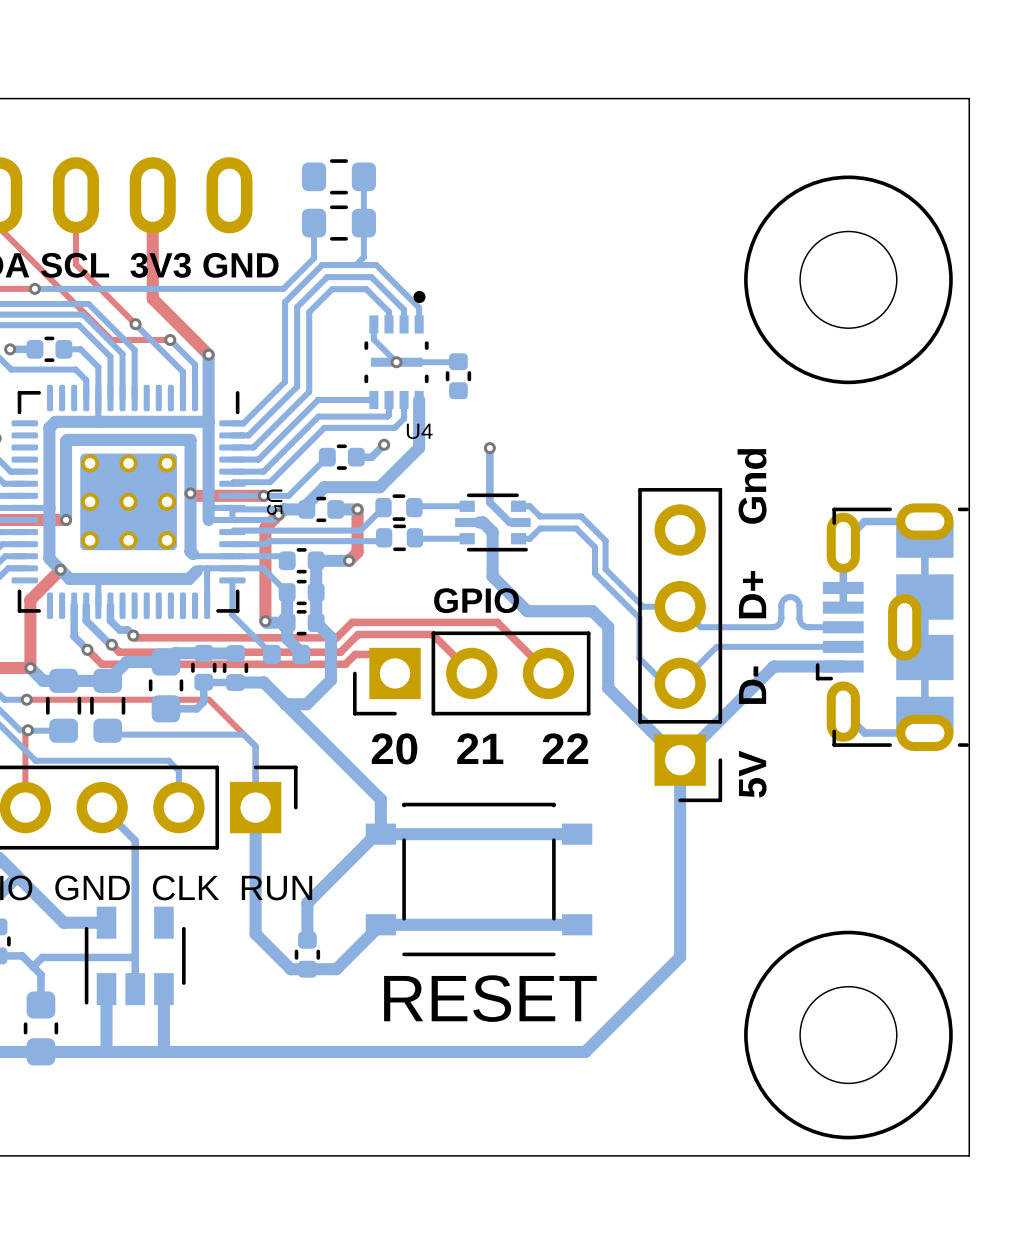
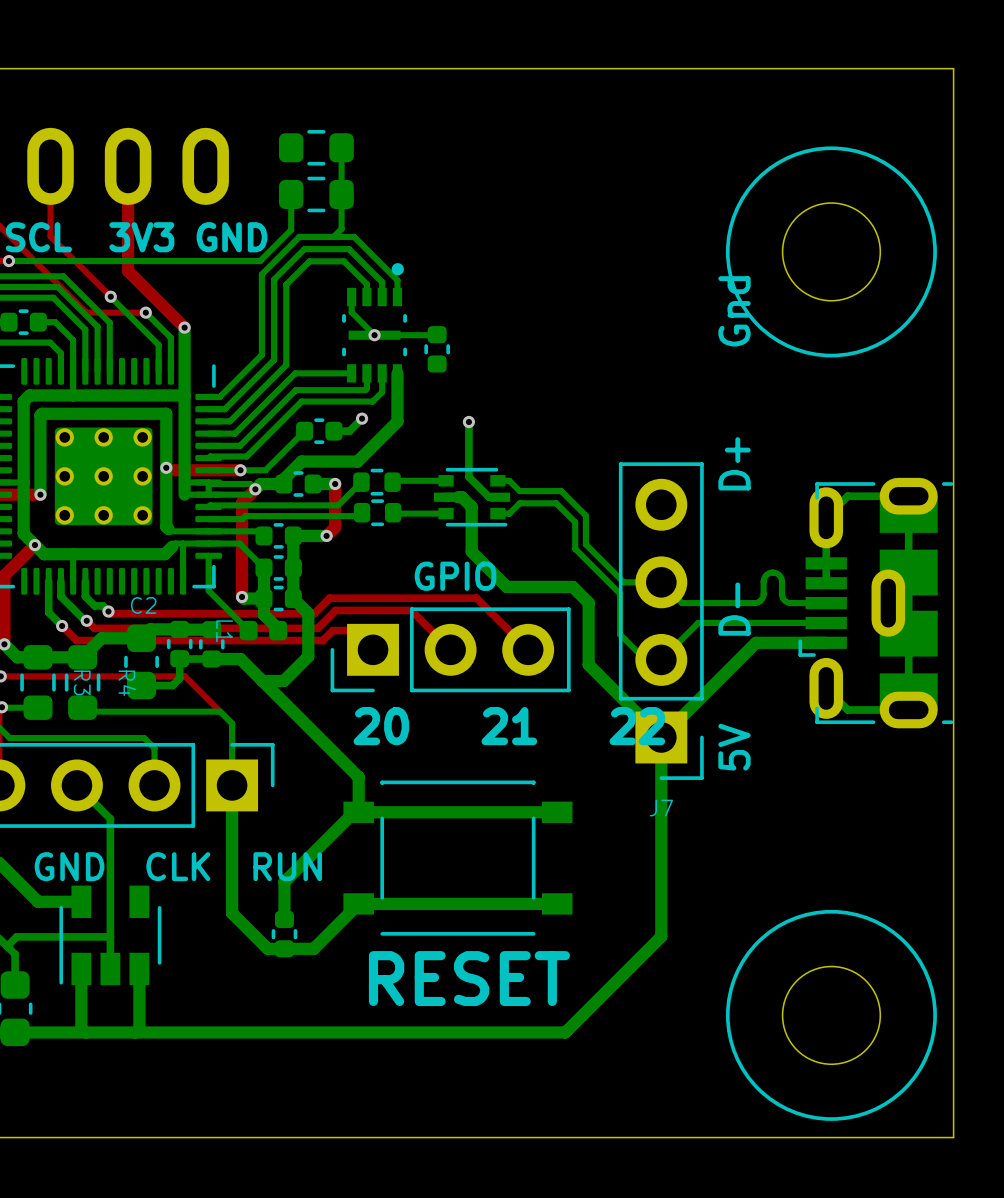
U4 name: U4 (419, 431) -> none
U5 name: U5 (274, 502) -> none
C2 name: none -> C2 (143, 605)
L1 name: none -> L1 (224, 631)
R3 name: none -> R3 (82, 682)
R4 name: none -> R4 (127, 683)
J7 name: none -> J7 (661, 808)

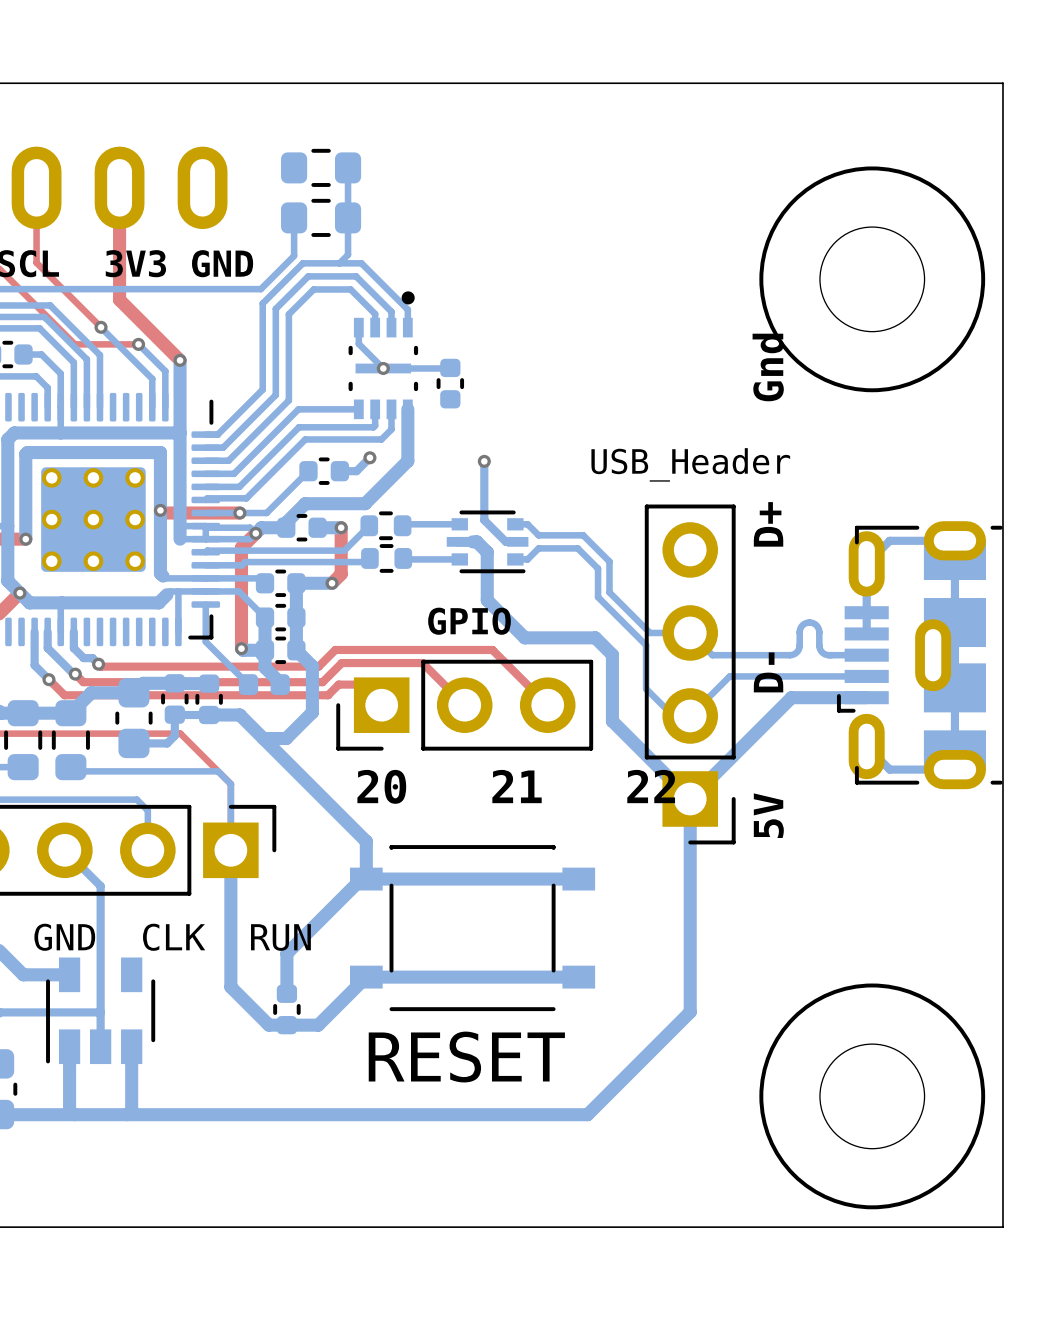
J7 value: none -> USB_Header (690, 464)
text: none -> GPIO (469, 621)
part value: GPIO (455, 576) -> none
C2 name: C2 (143, 605) -> none
L1 name: L1 (224, 631) -> none
R3 name: R3 (82, 682) -> none
R4 name: R4 (127, 683) -> none
J7 name: J7 (661, 808) -> none

